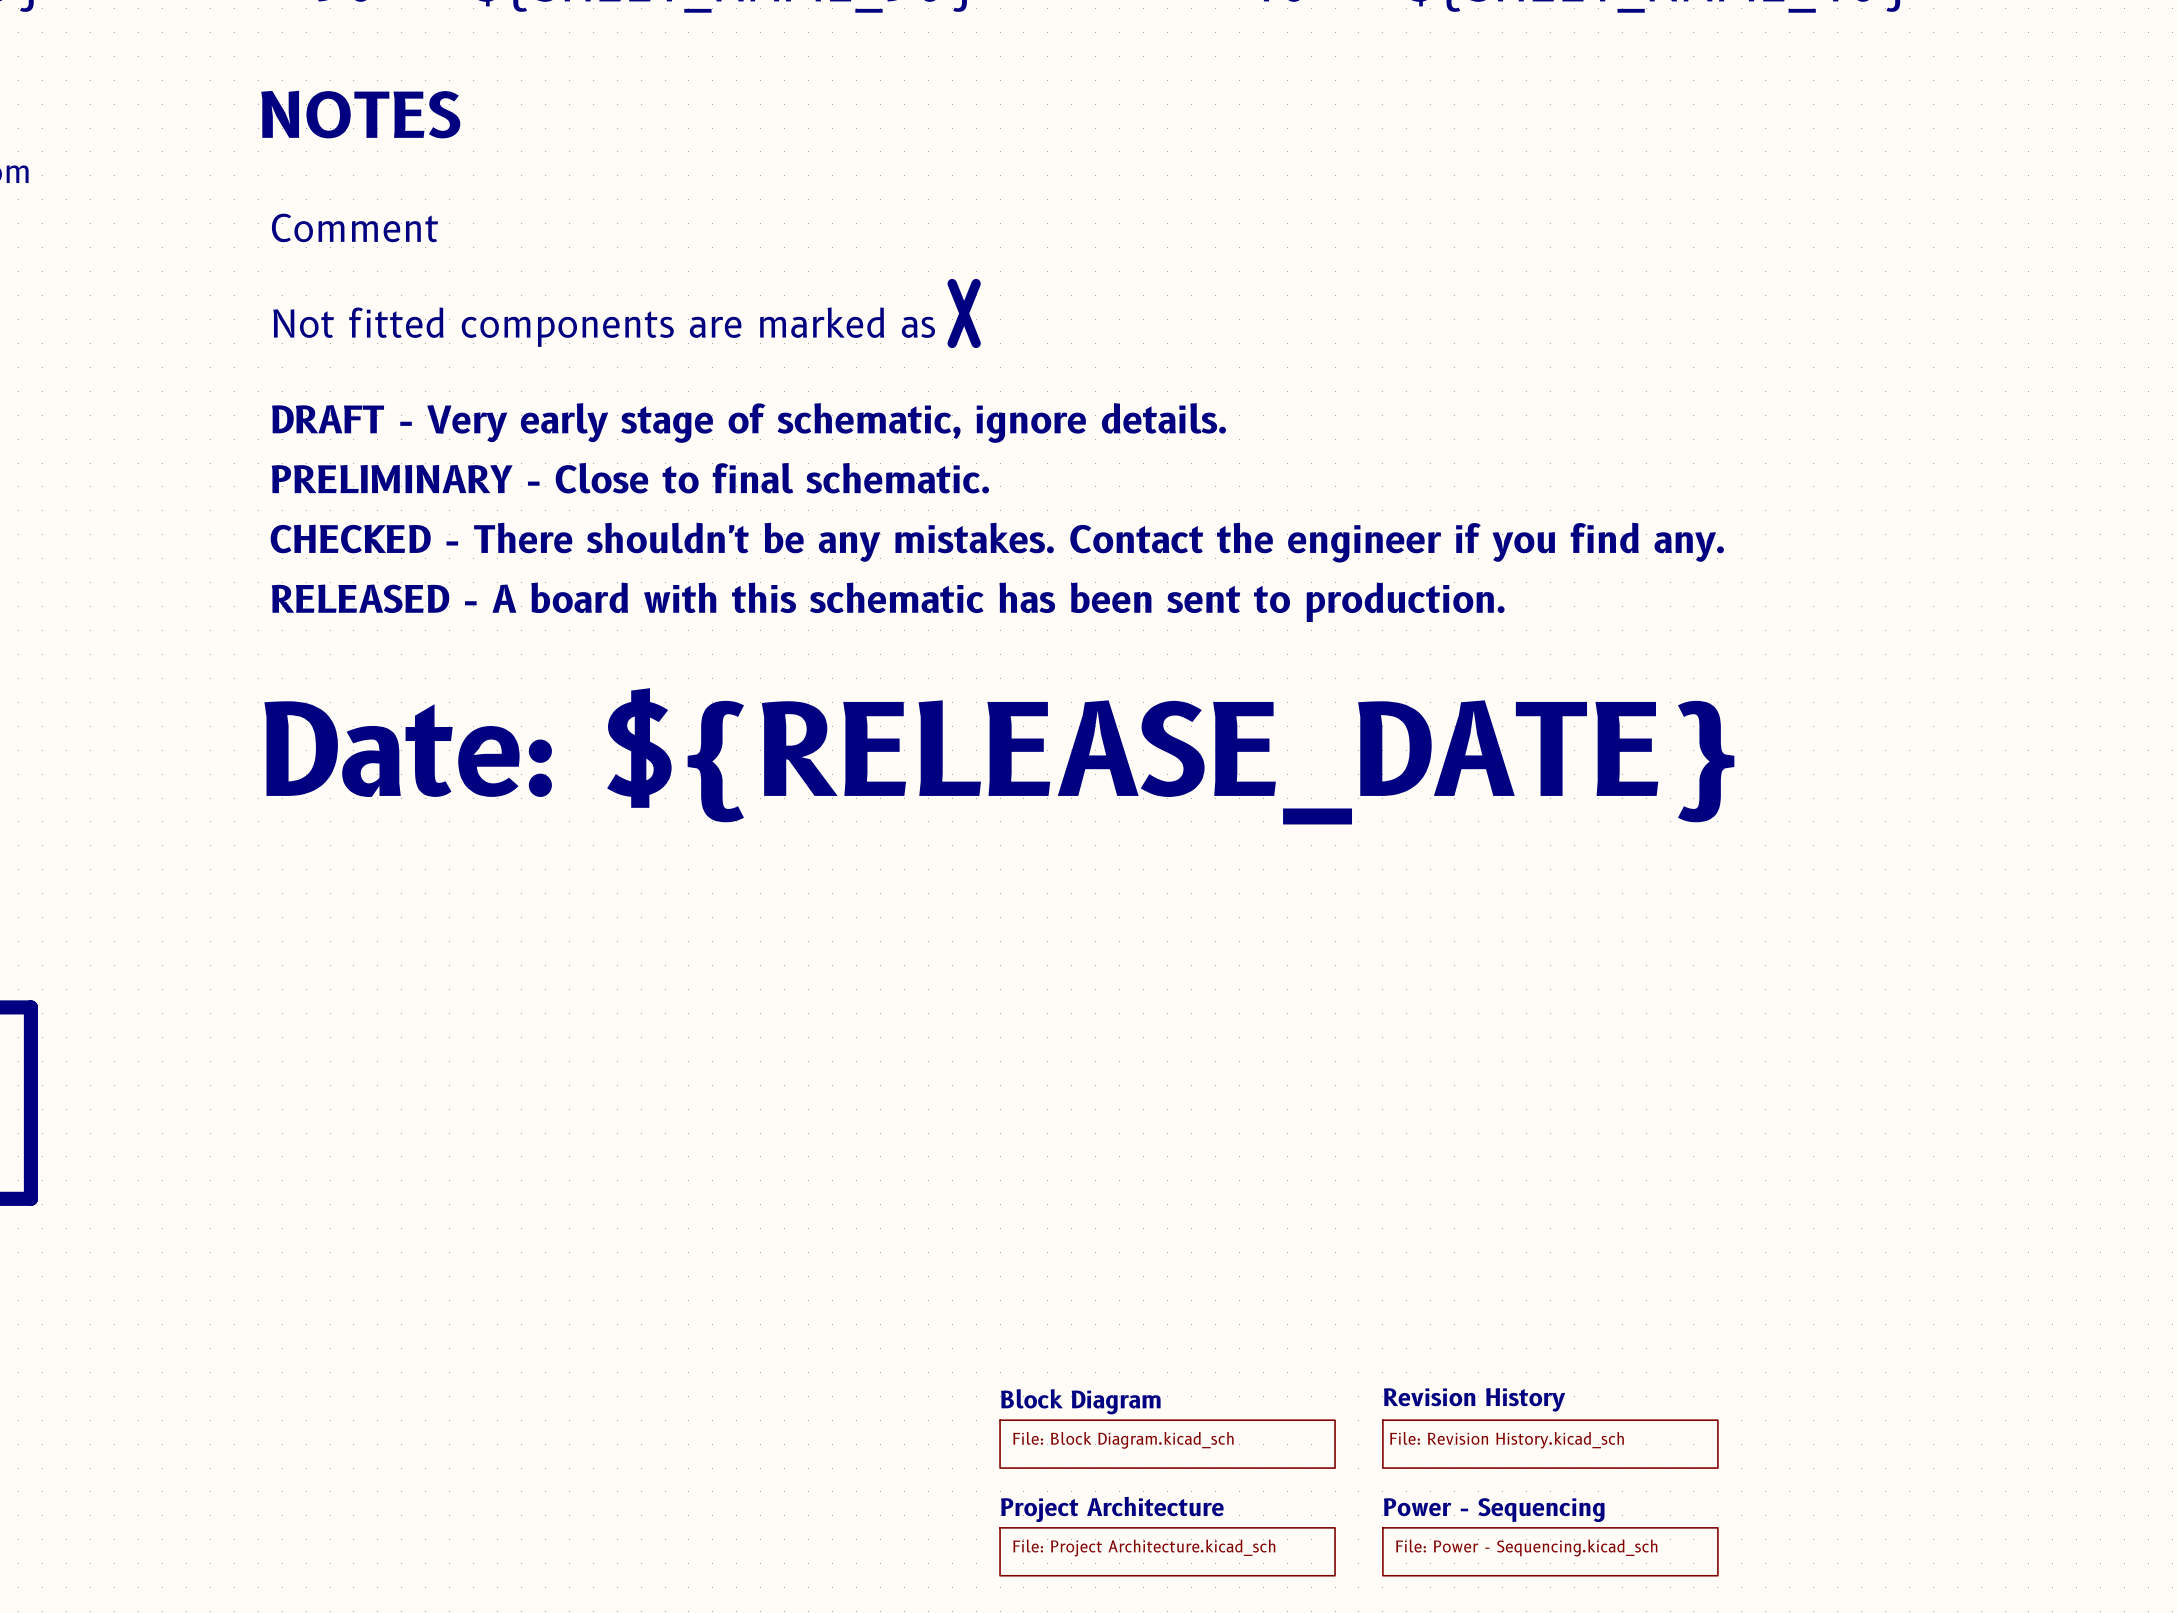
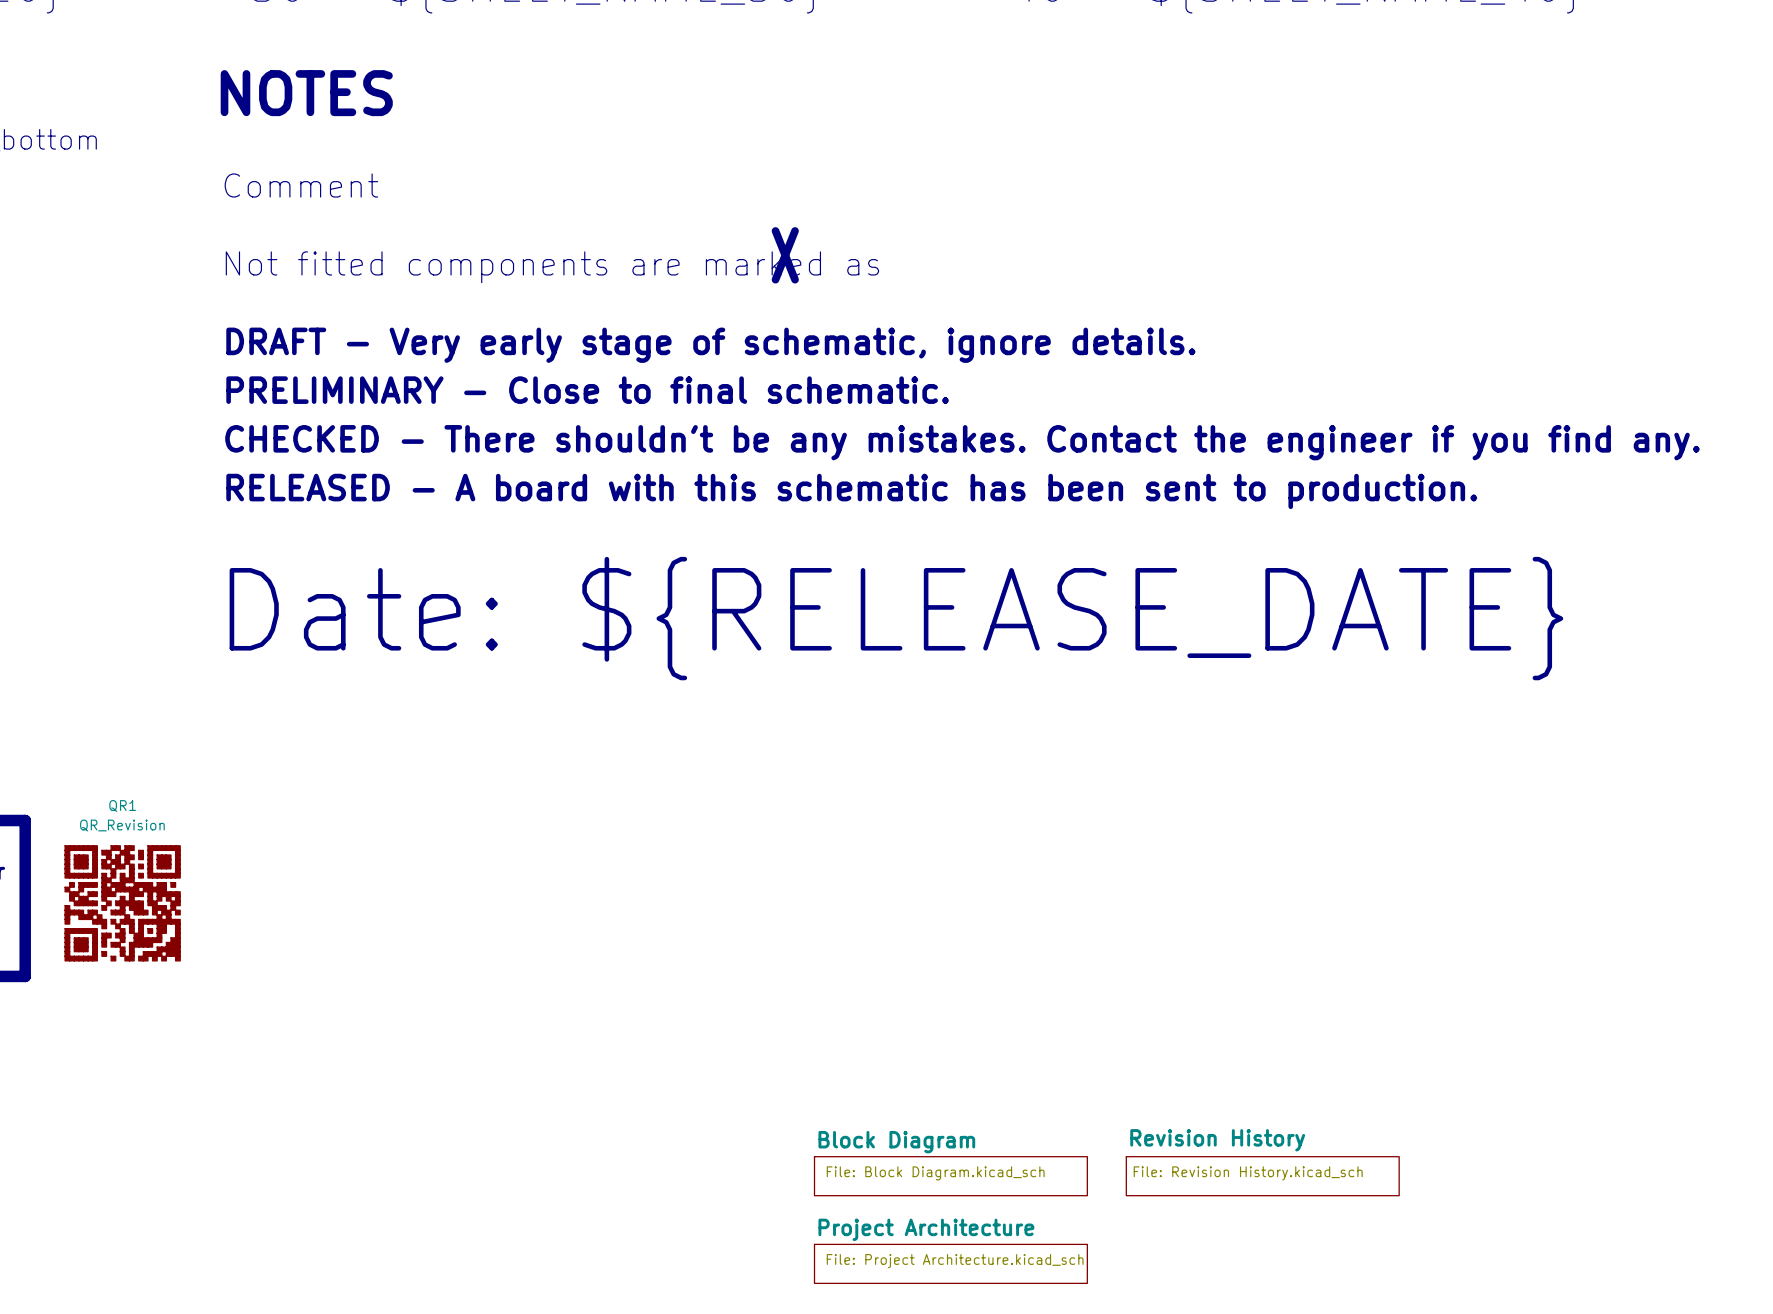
QR1: none -> QR_Revision (122, 903)
sheet Power - Sequencing: File: Power - Sequencing.kicad_sch (1550, 1551) -> none

